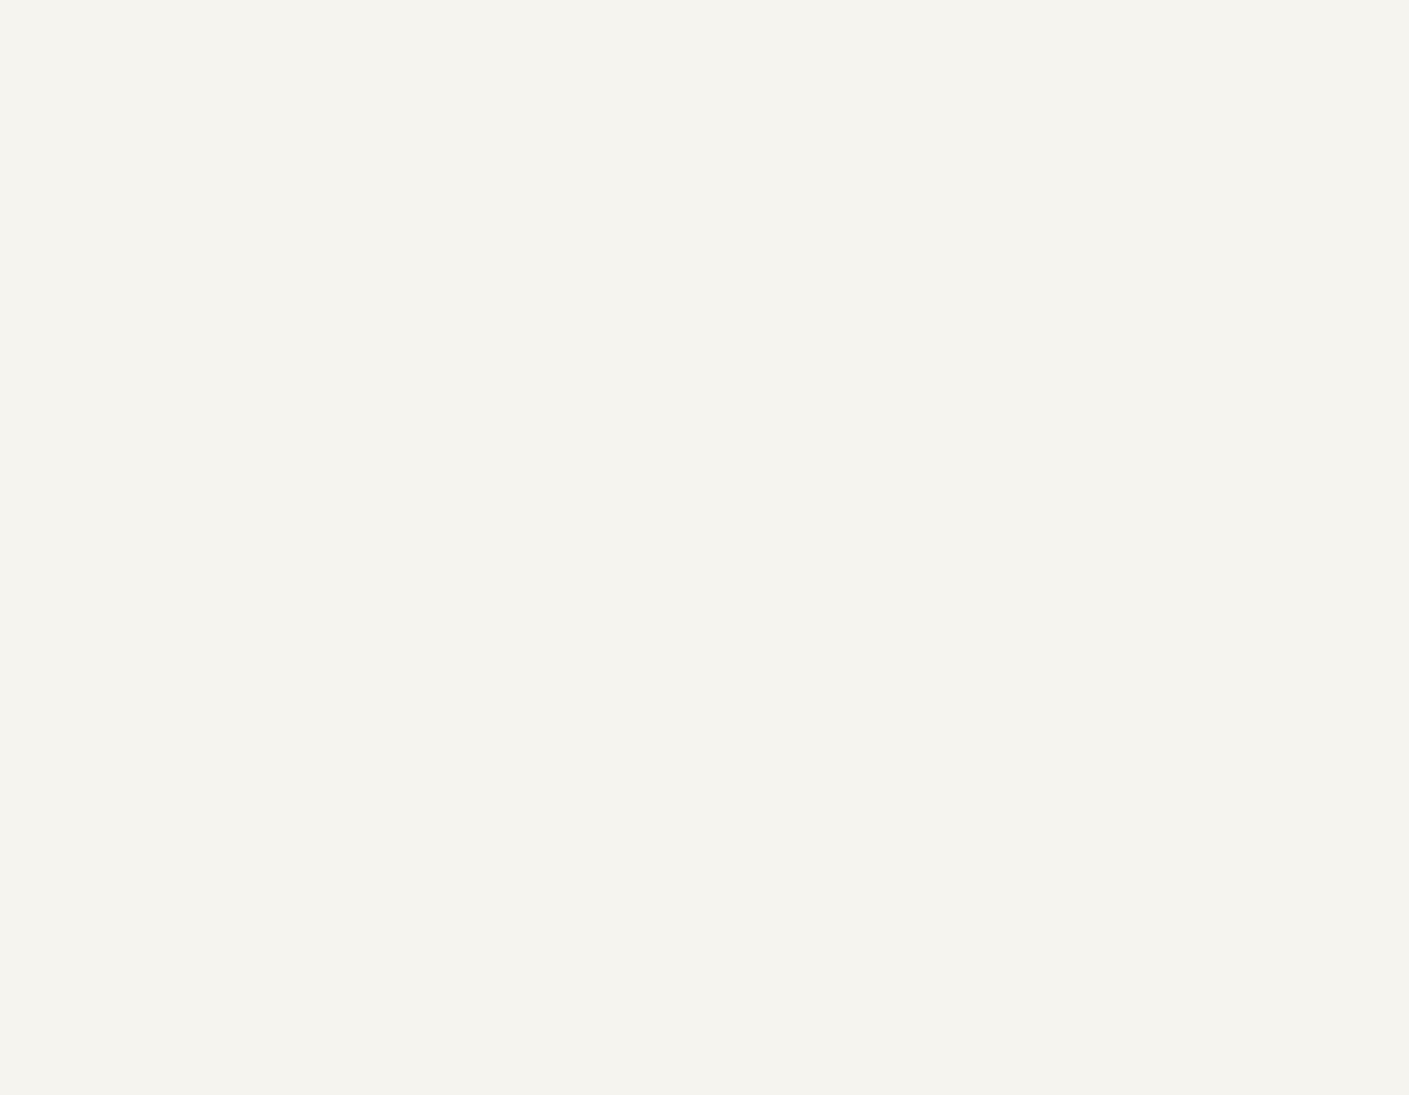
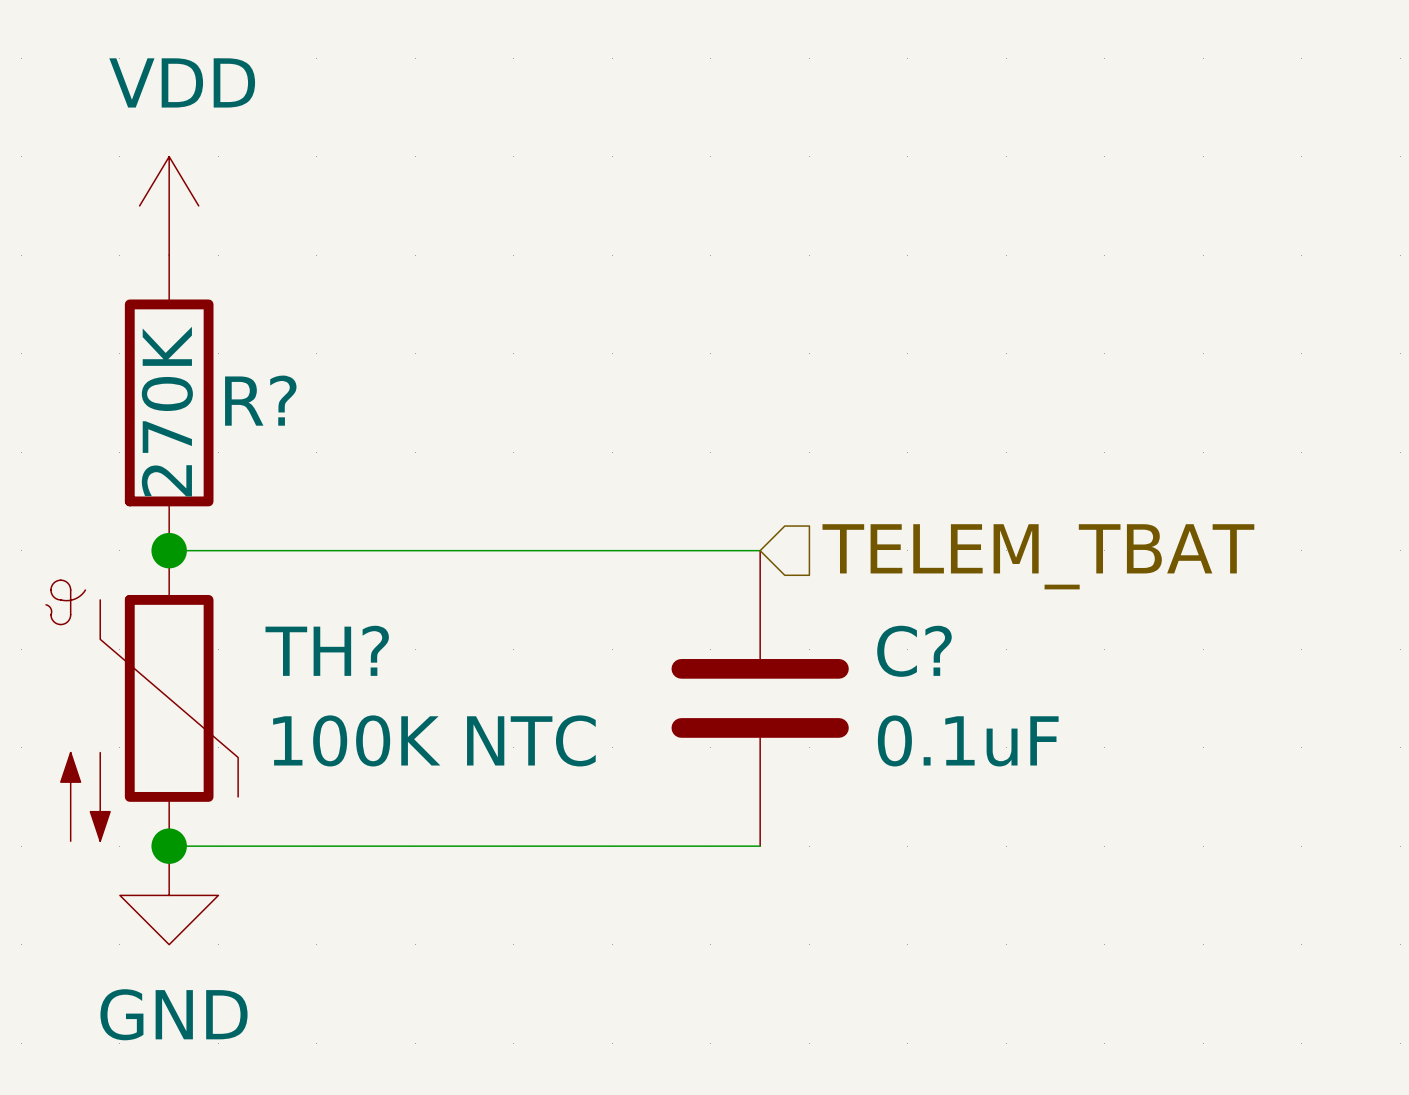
power symbol: none -> VDD (169, 205)
R?: none -> 270K (169, 402)
wire: none -> (169, 550) (760, 550)
junction: none -> (169, 550)
hierarchical label: none -> TELEM_TBAT (1038, 556)
TH?: none -> 100K NTC (142, 698)
C?: none -> 0.1uF (760, 698)
wire: none -> (169, 846) (760, 846)
junction: none -> (169, 846)
power symbol: none -> GND (169, 895)

